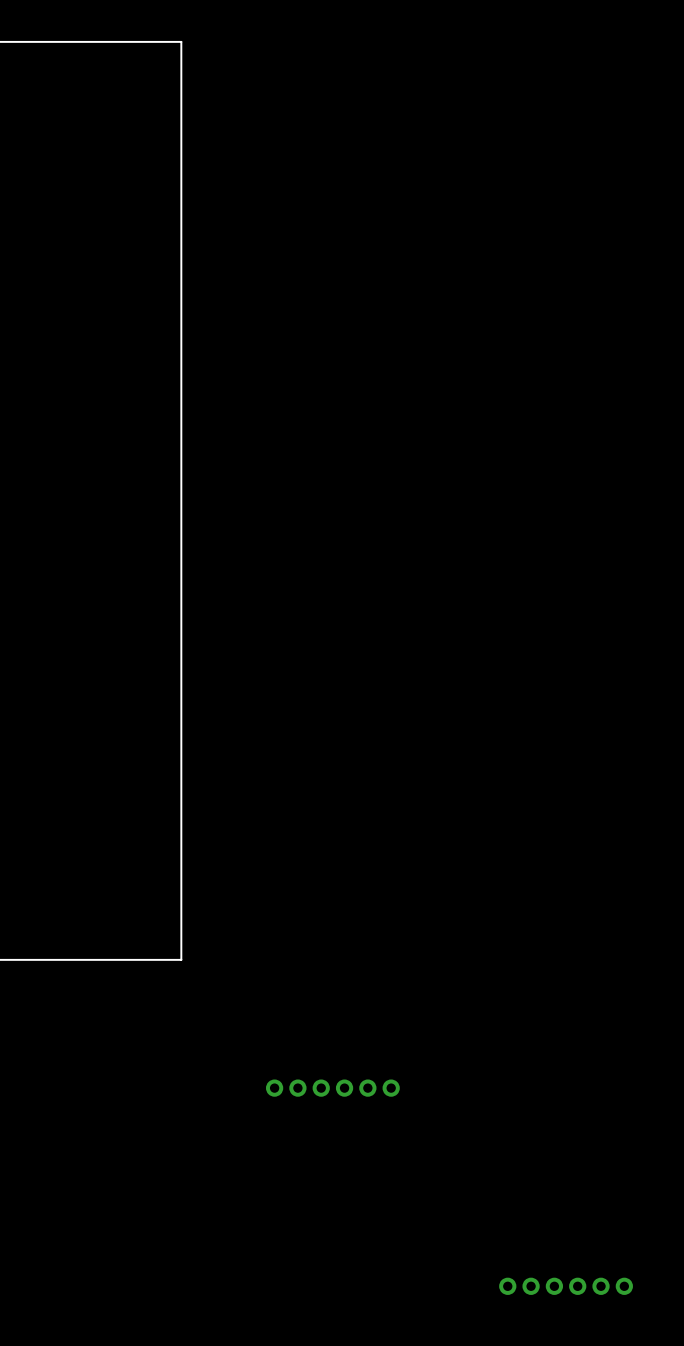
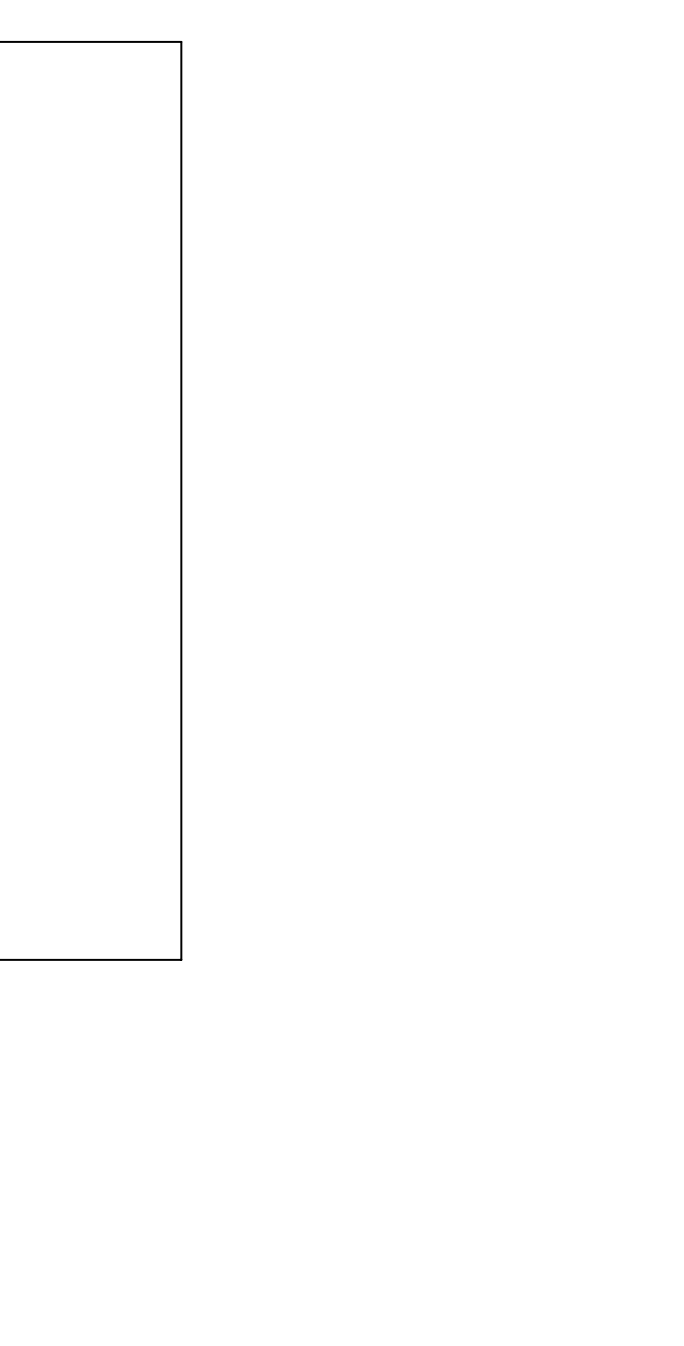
part: (332, 1088) -> none
part: (566, 1286) -> none

